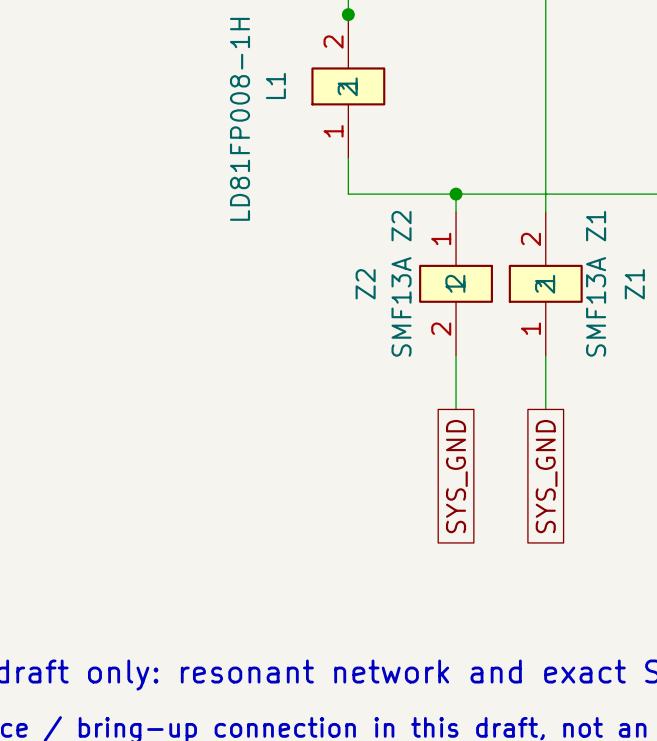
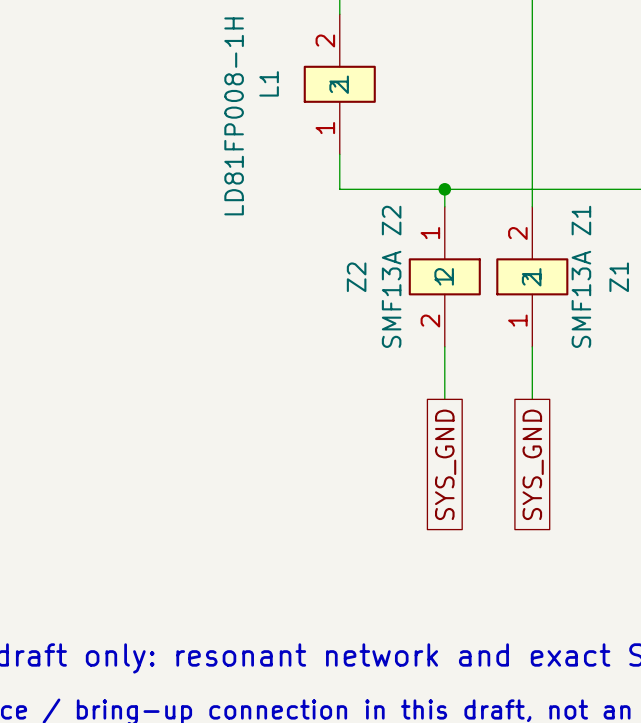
junction: (348, 14) -> none

